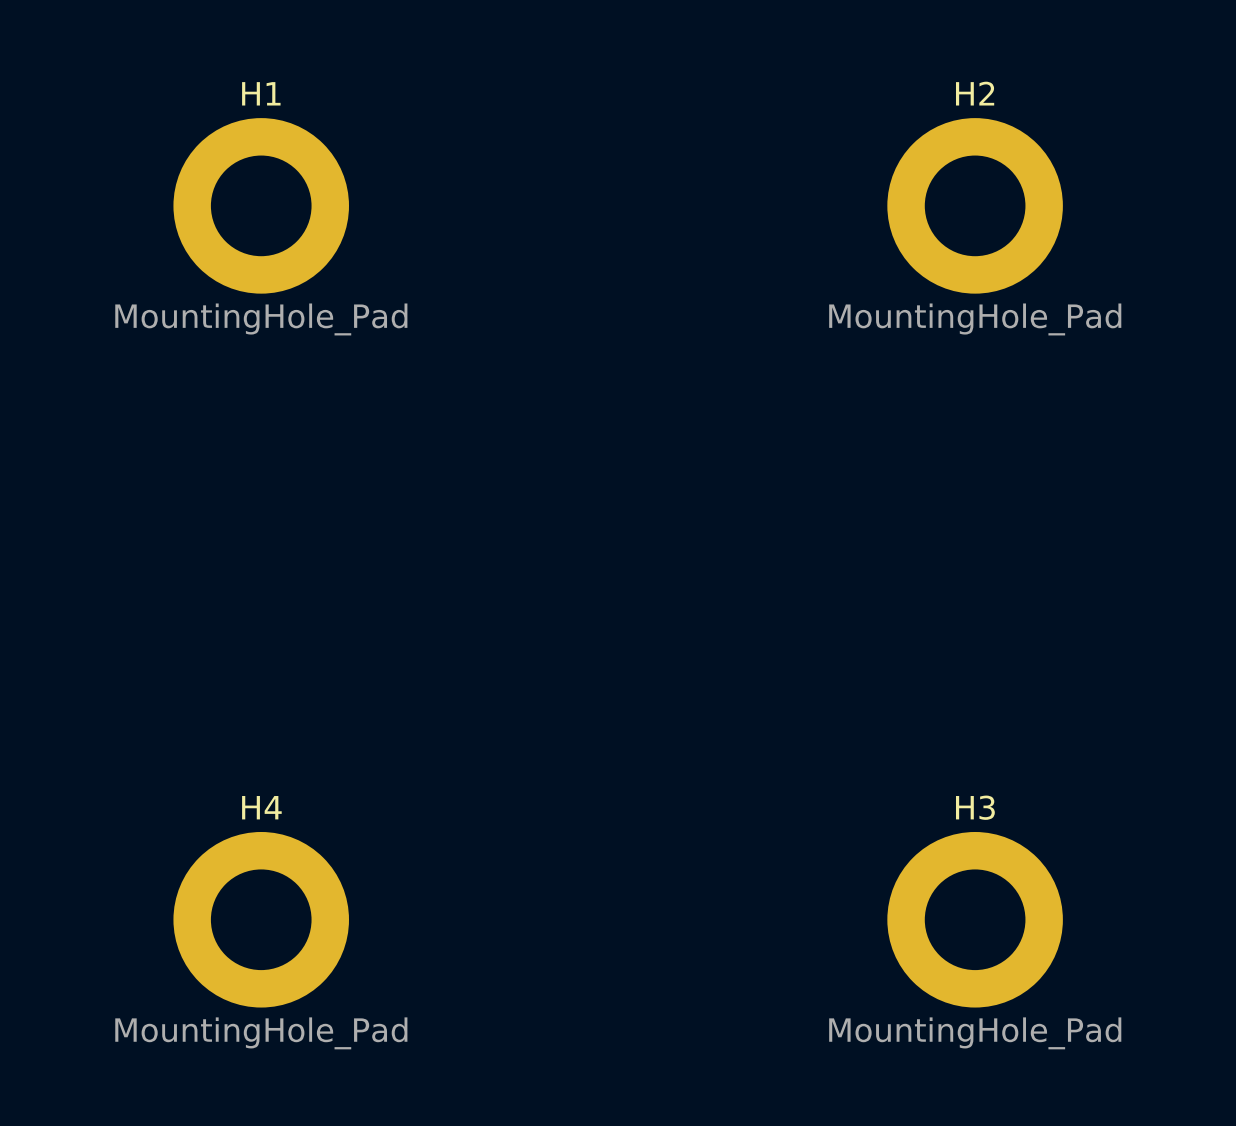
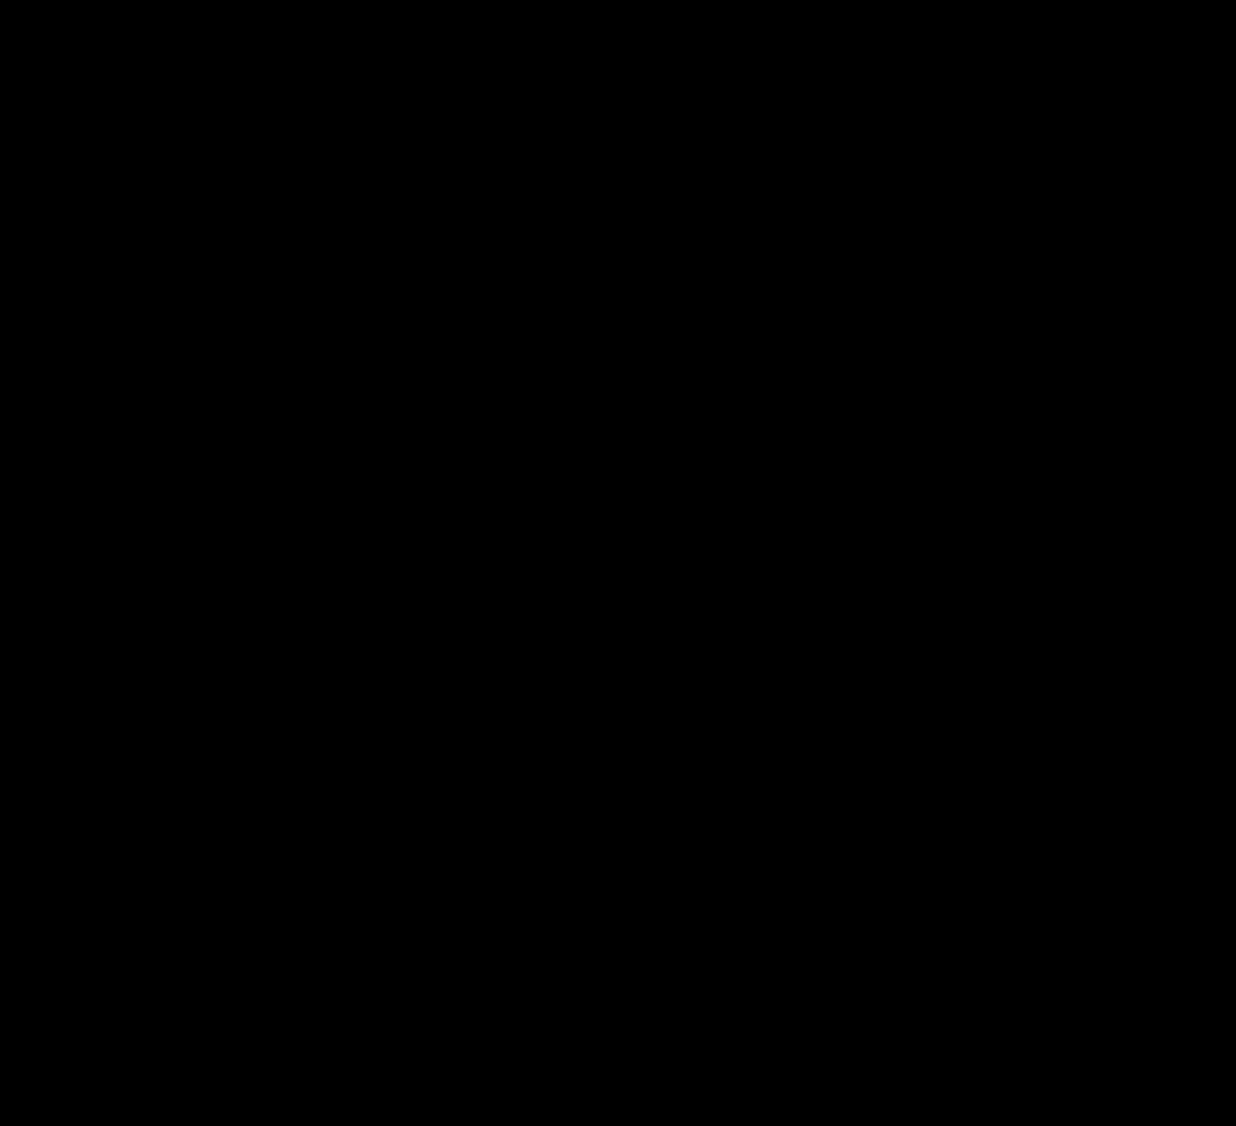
H1: MountingHole_Pad (261, 205) -> none
H2: MountingHole_Pad (975, 205) -> none
H4: MountingHole_Pad (261, 919) -> none
H3: MountingHole_Pad (975, 919) -> none

